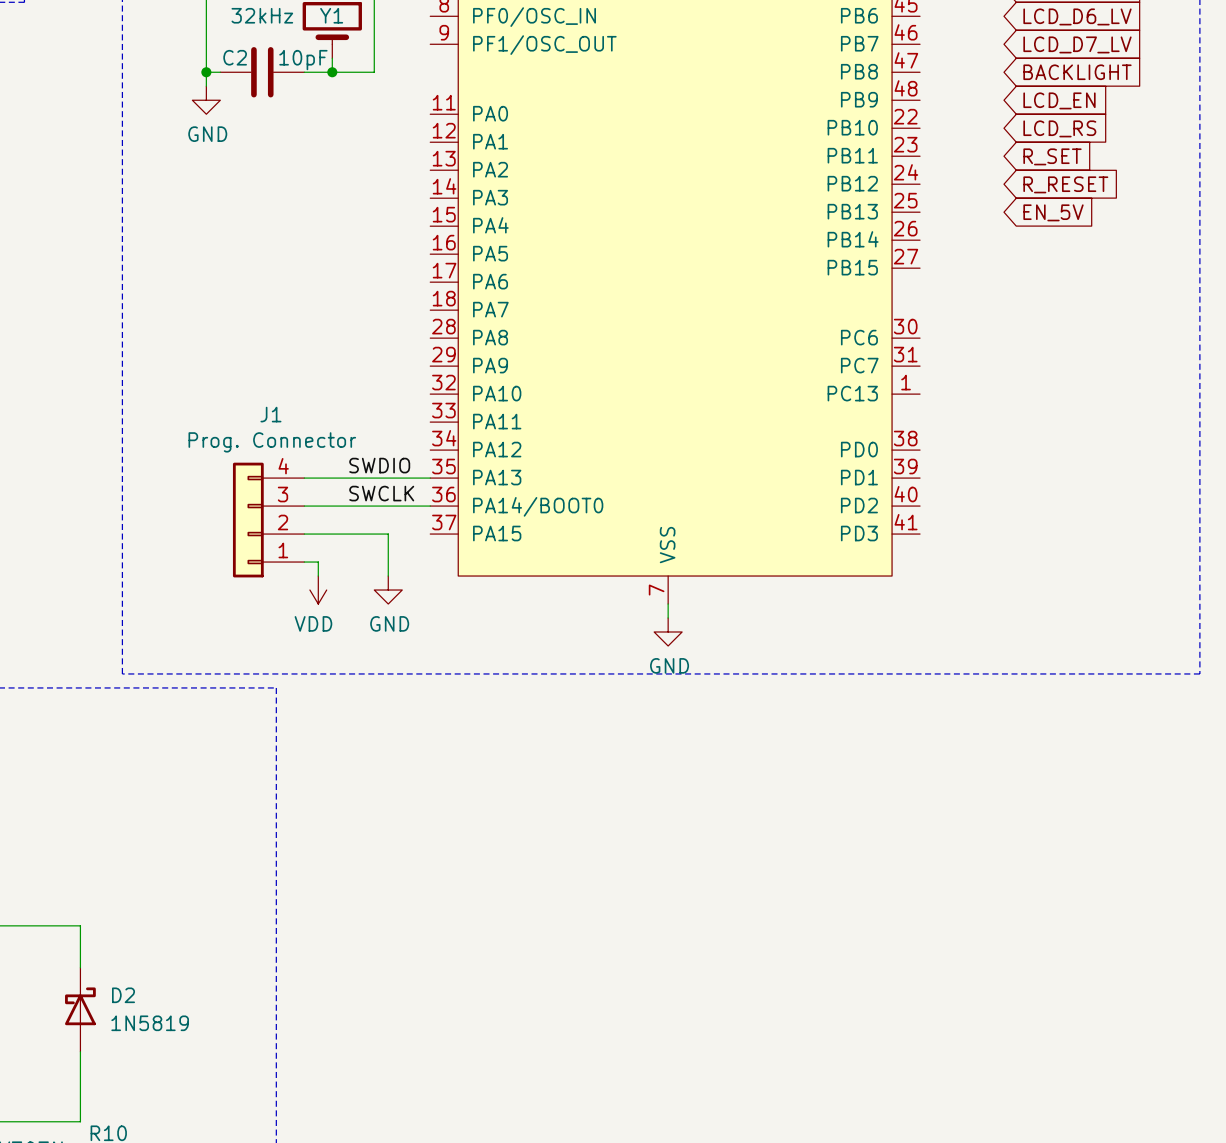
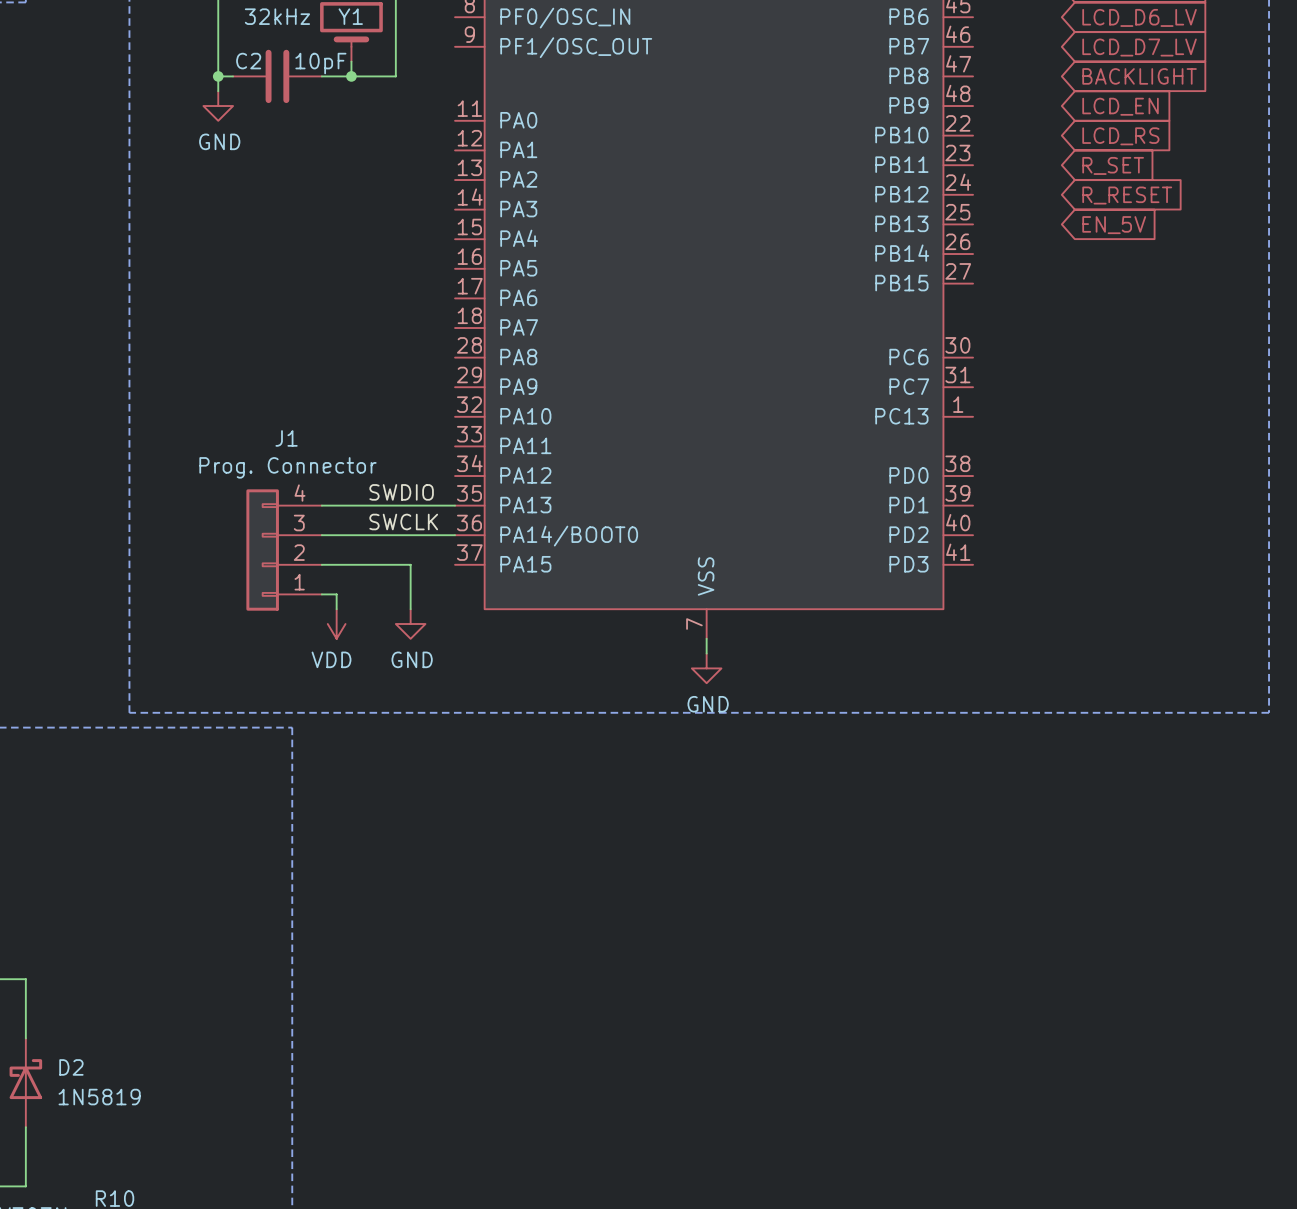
wire: (24, 925) (80, 925) (80, 967) -> (25, 979) (25, 1038)
D2 position: (80, 1009) -> (25, 1082)
wire: (80, 1051) (80, 1121) (24, 1121) -> (25, 1127) (25, 1186)

